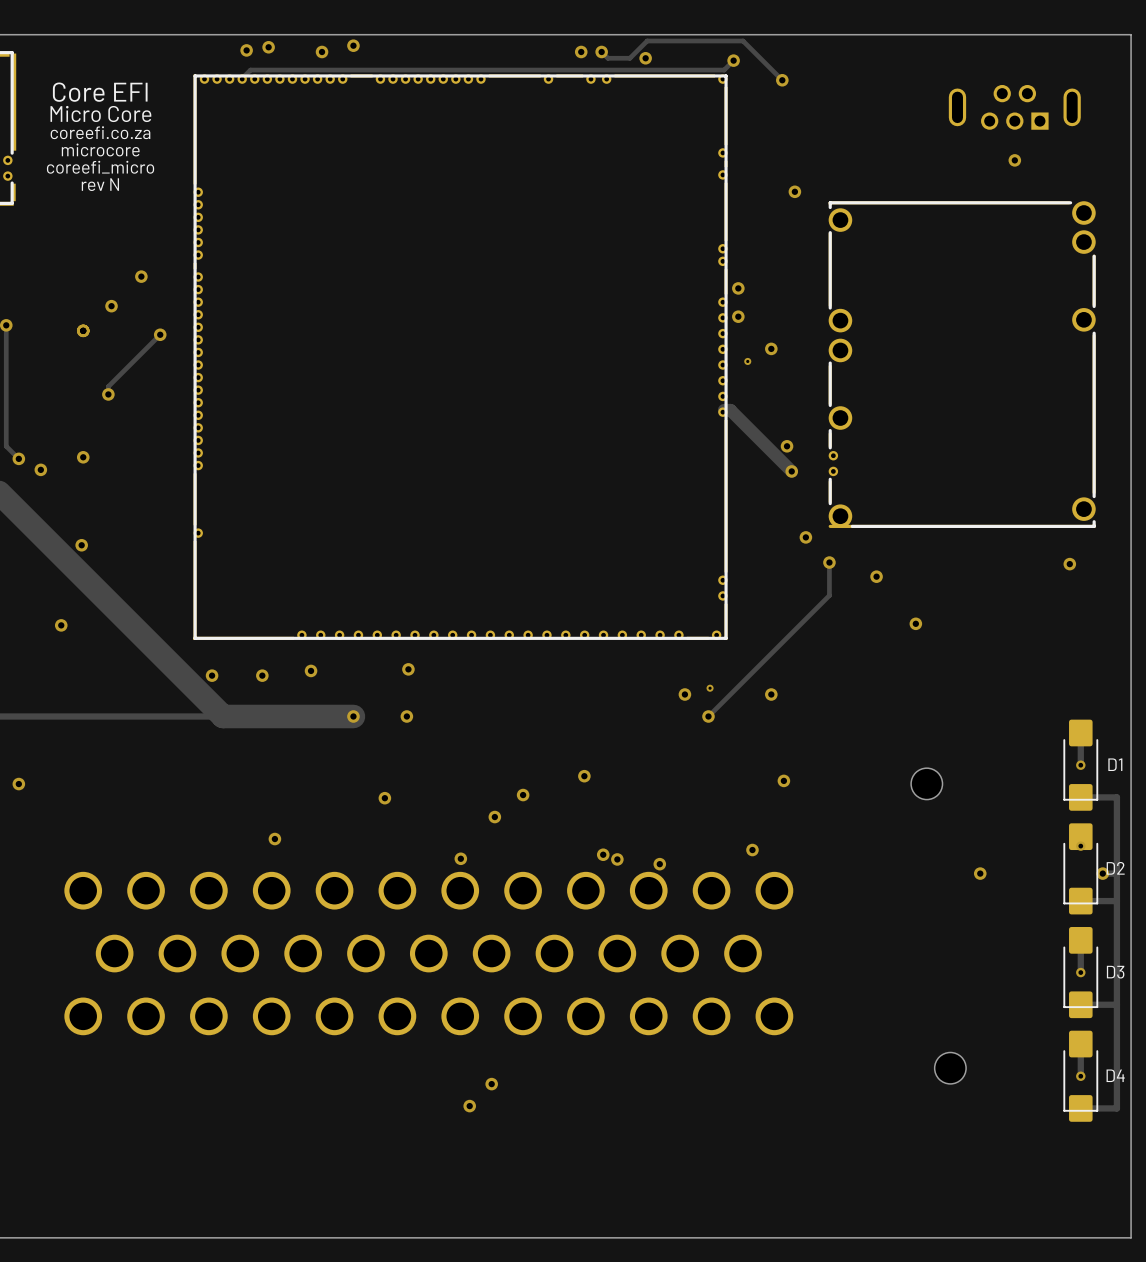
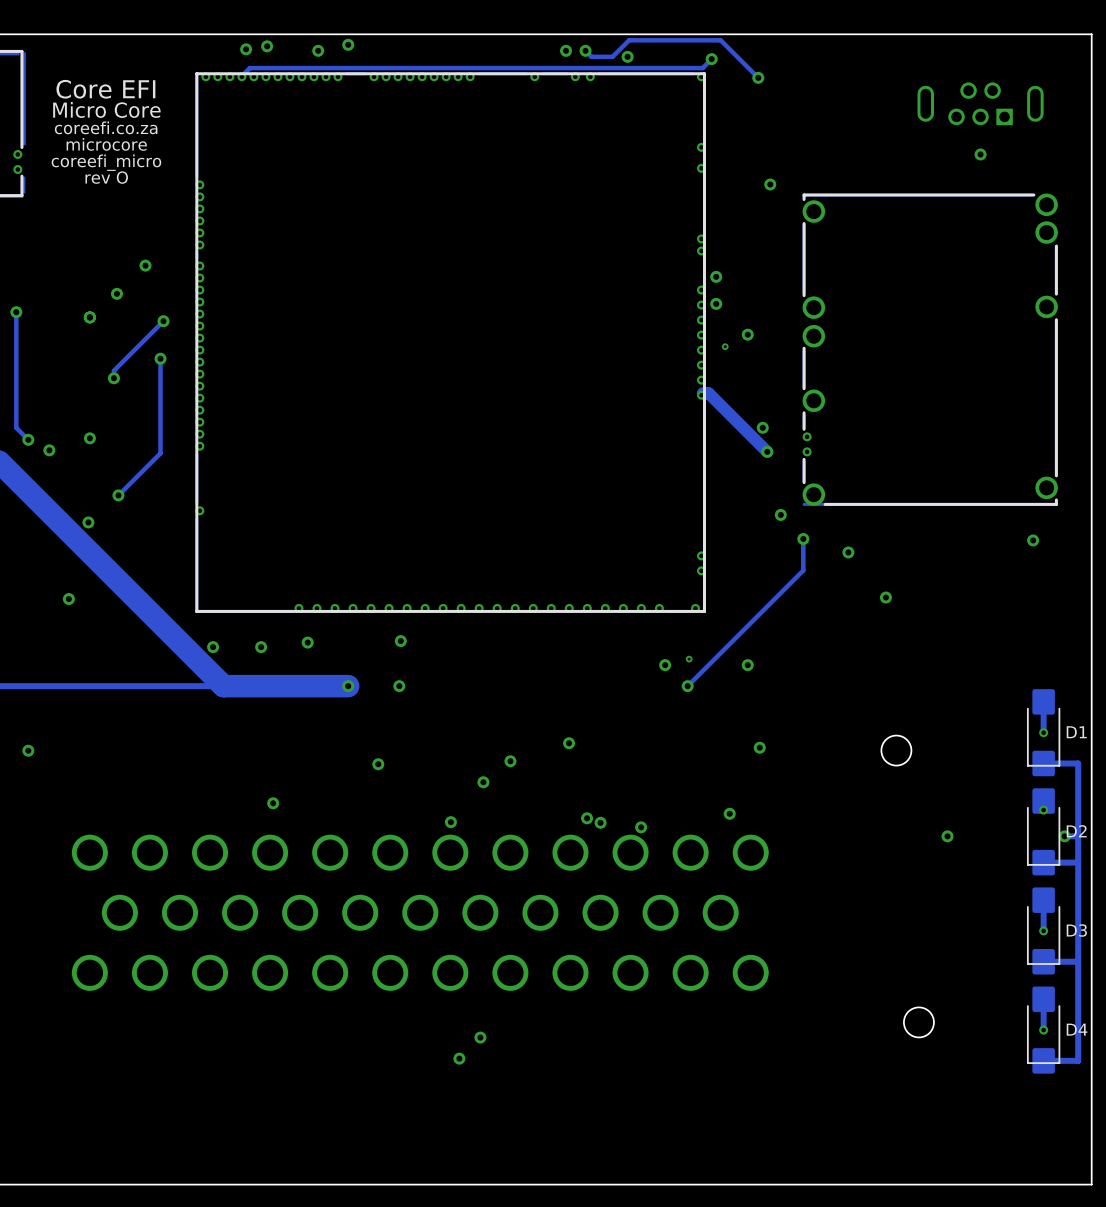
text: rev N (100, 184) -> rev O (106, 177)
track: none -> (160, 358) (160, 453) (118, 495)
via: none -> (160, 358)
via: none -> (118, 495)

